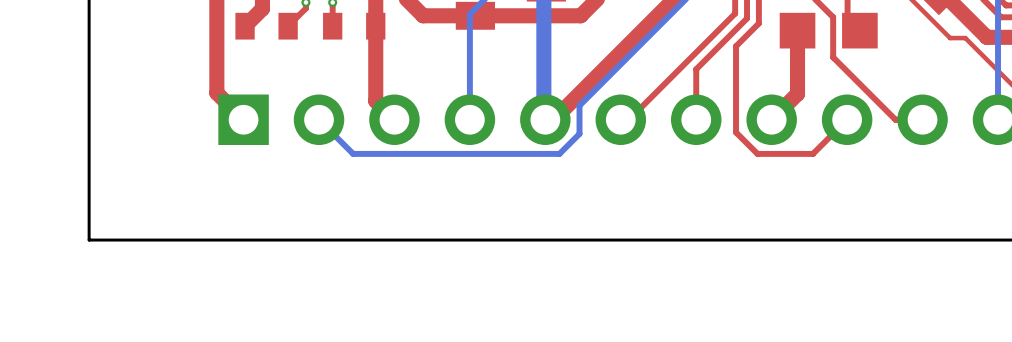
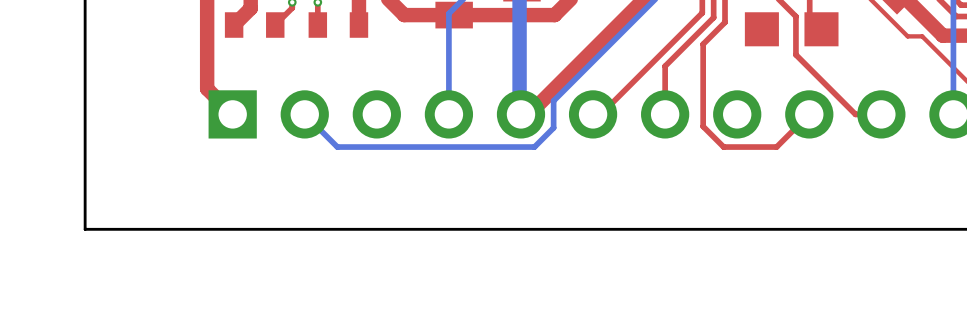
top track: (375, 26) (375, 101) (394, 119) -> none
top track: (797, 30) (797, 93) (771, 119) -> none

